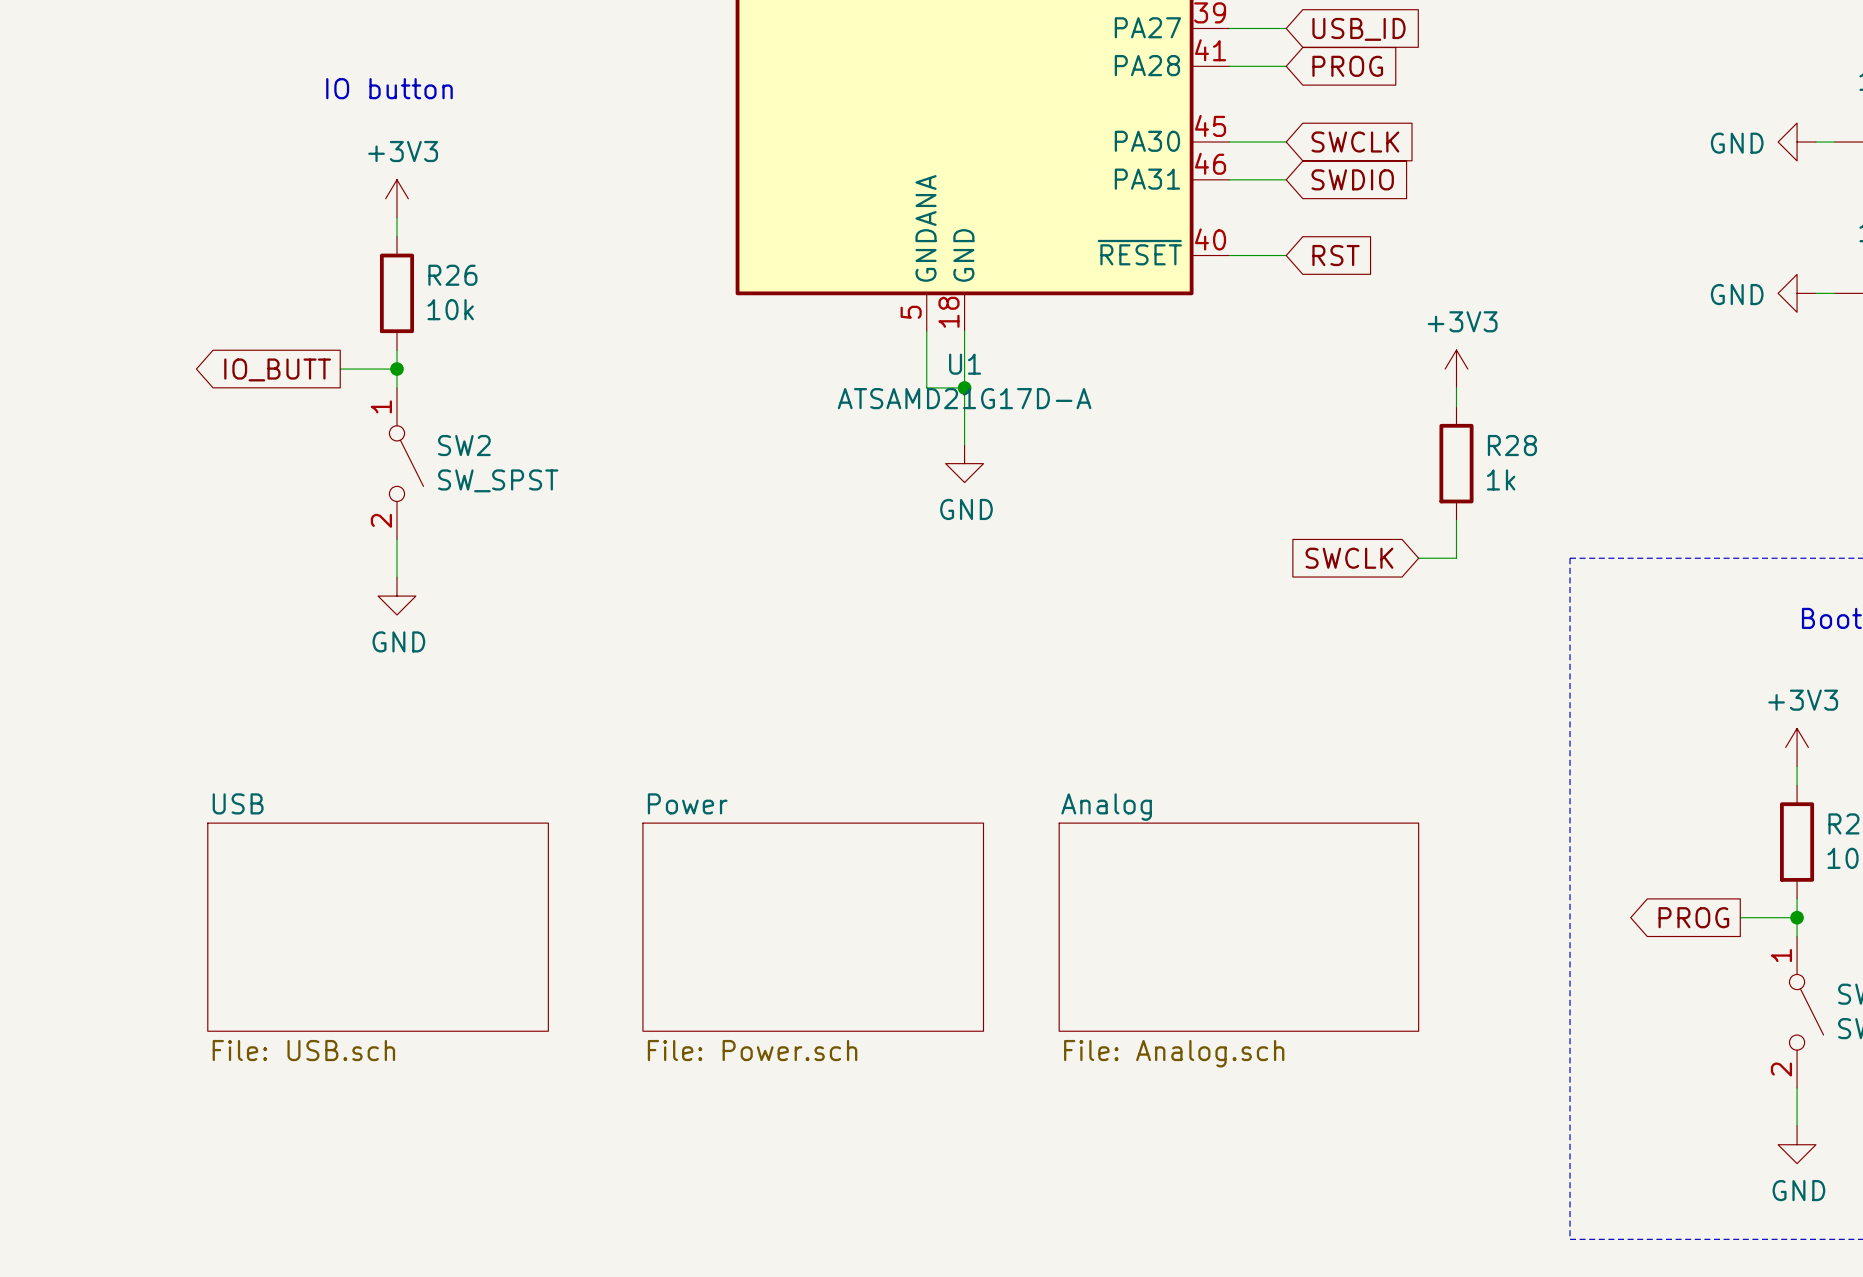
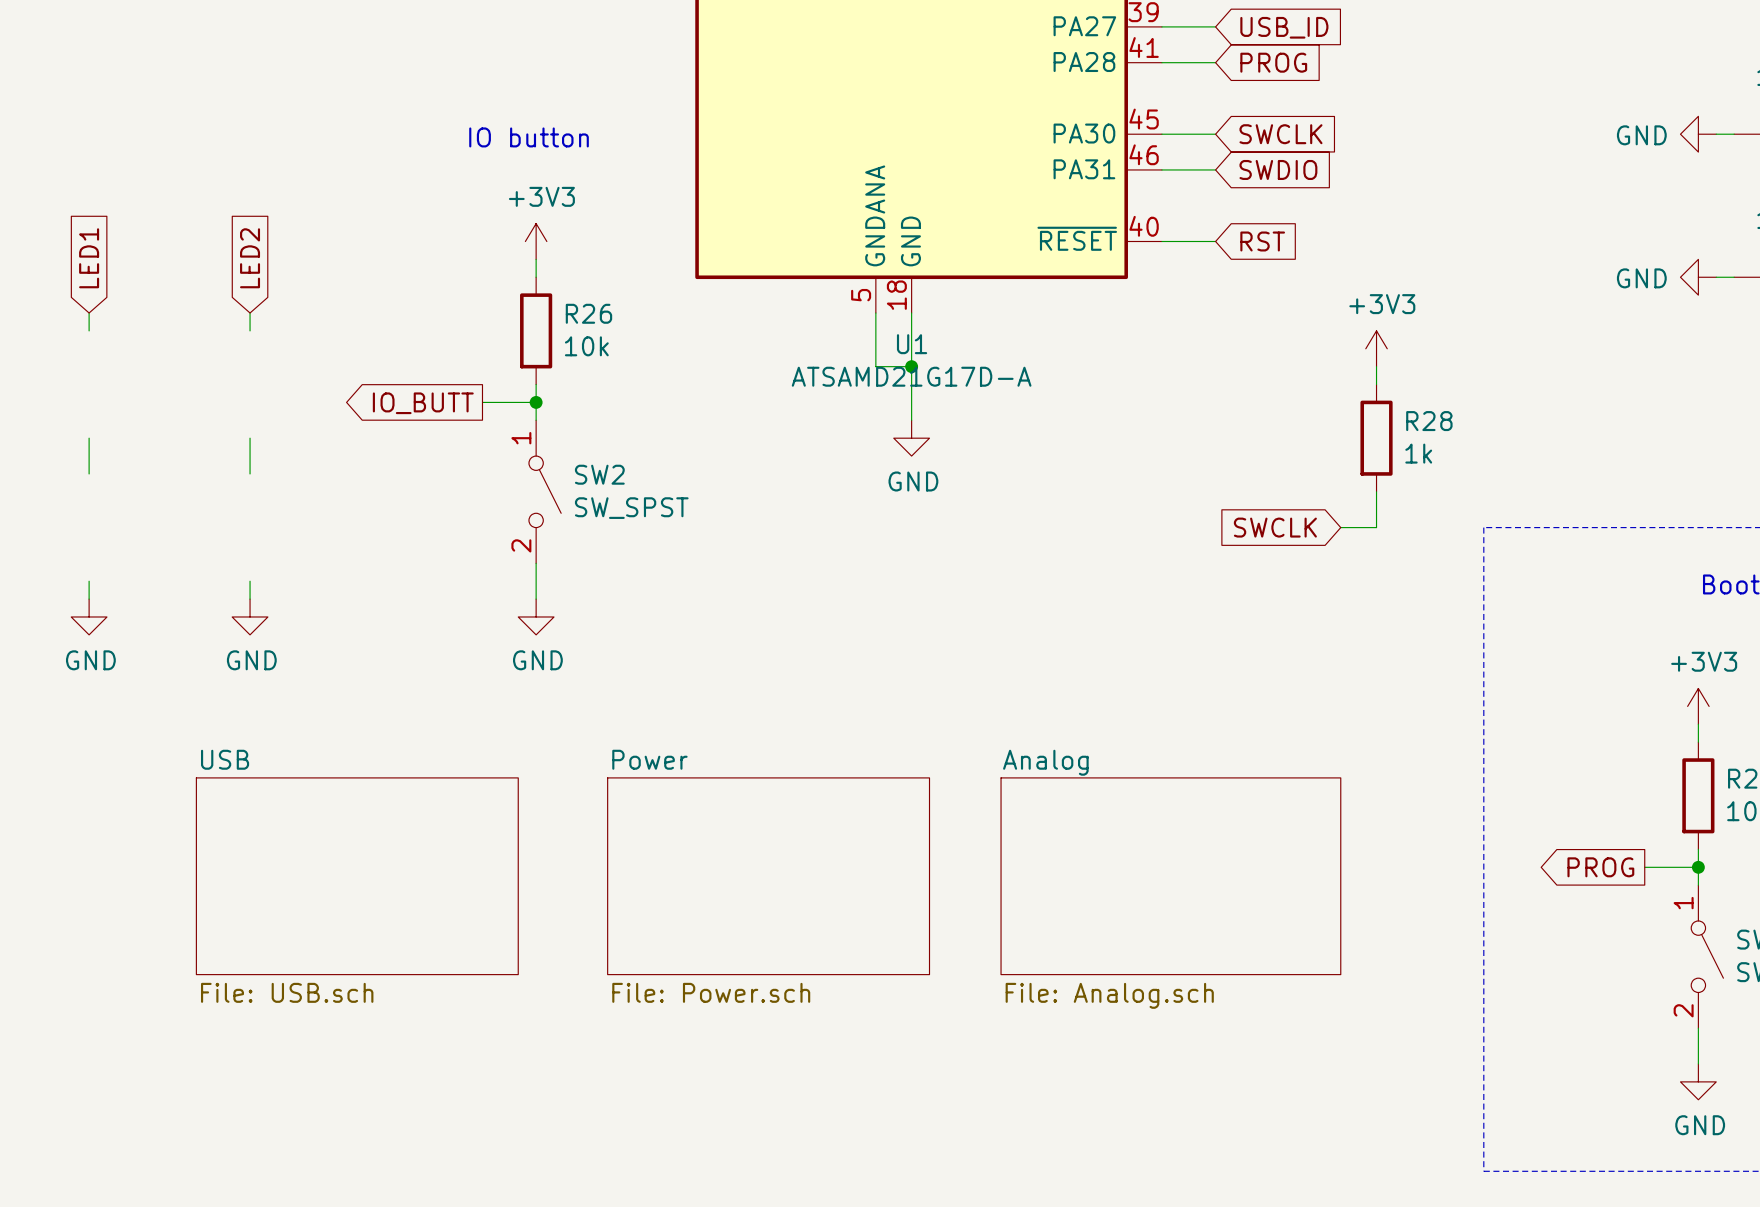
text position: IO button (389, 88) -> IO button (529, 137)
power symbol position: +3V3 (396, 198) -> +3V3 (536, 241)
wire: (396, 217) (396, 236) -> (536, 259) (536, 277)
global label: none -> LED1 (89, 258)
global label: none -> LED2 (250, 258)
R26 position: (396, 293) -> (536, 330)
wire: none -> (89, 313) (89, 330)
wire: none -> (250, 313) (250, 330)
wire: (396, 350) (396, 387) -> (536, 384) (536, 420)
global label position: IO_BUTT (277, 369) -> IO_BUTT (423, 403)
wire: (340, 369) (396, 369) -> (482, 402) (536, 402)
junction: (396, 369) -> none
junction: none -> (536, 402)
wire: none -> (89, 438) (89, 473)
wire: none -> (250, 438) (250, 473)
SW2 position: (406, 463) -> (545, 491)
wire: (396, 539) (396, 577) -> (536, 563) (536, 599)
power symbol: GND (396, 596) -> none
wire: none -> (89, 581) (89, 599)
wire: none -> (250, 581) (250, 599)
power symbol: none -> GND (89, 616)
power symbol: none -> GND (250, 616)
power symbol: none -> GND (536, 616)

